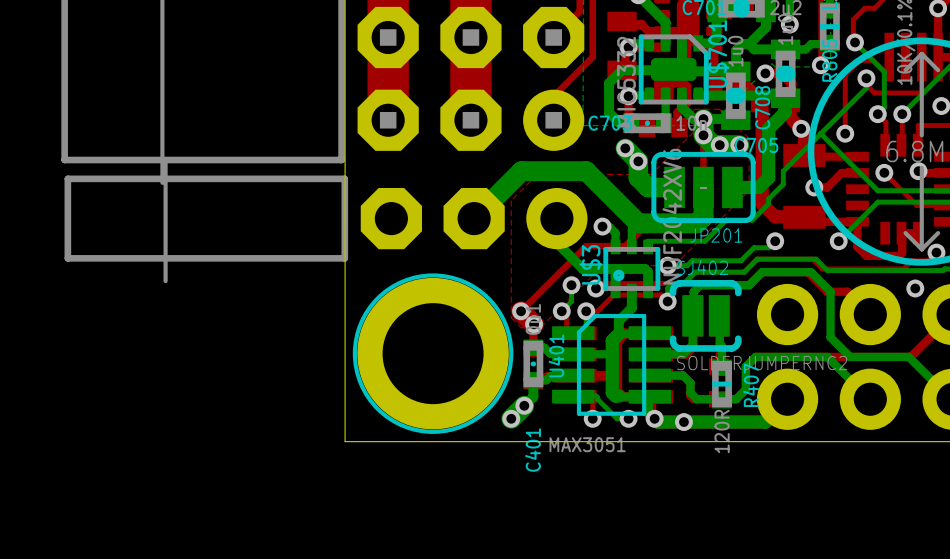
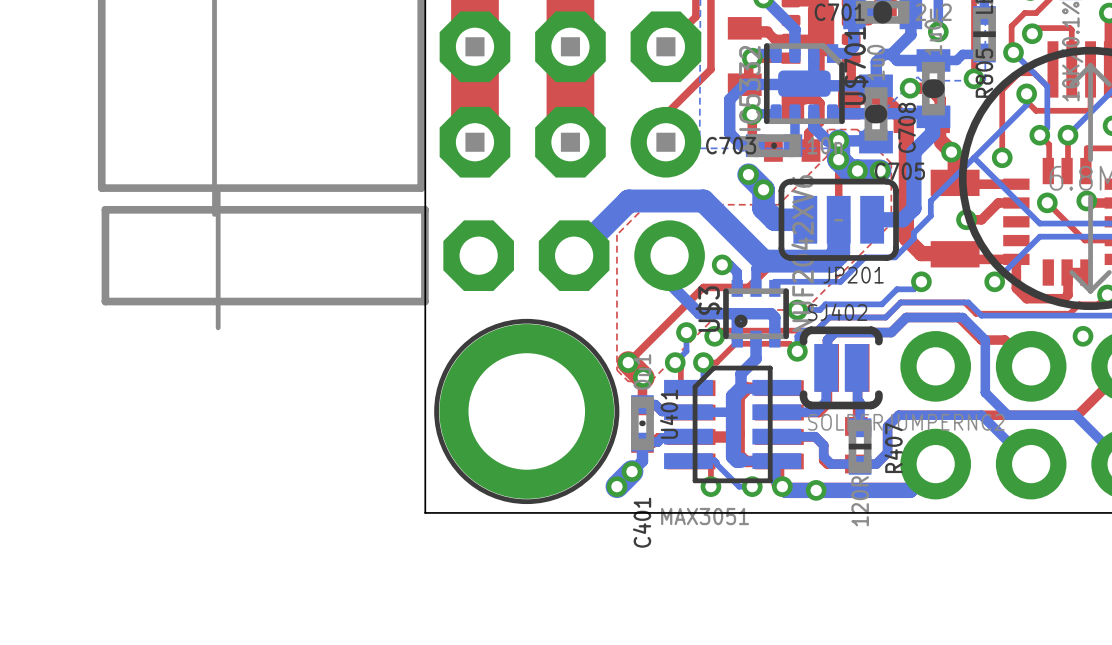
top track: none -> (1032, 33) (1036, 28) (1069, 28) (1071, 29) (1071, 69)
via: none -> (1032, 33)

